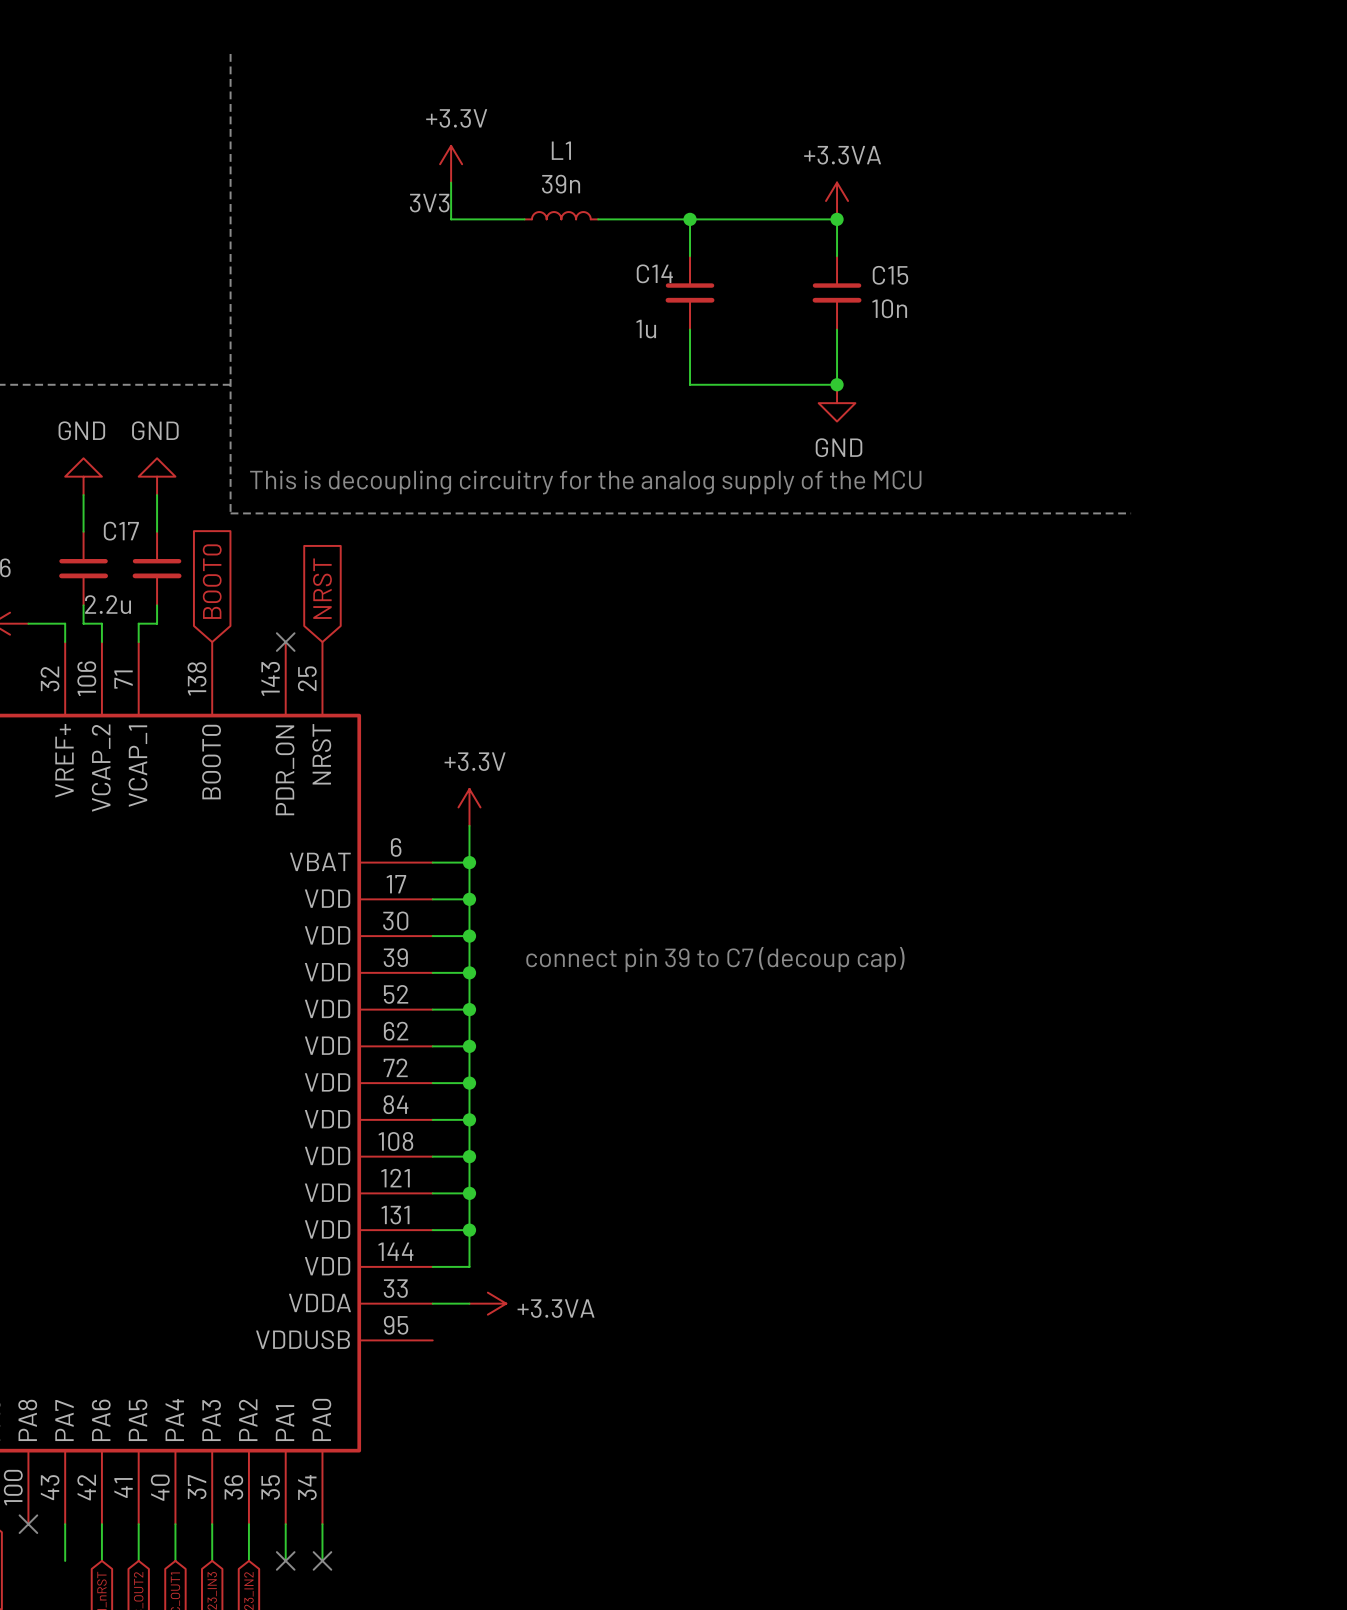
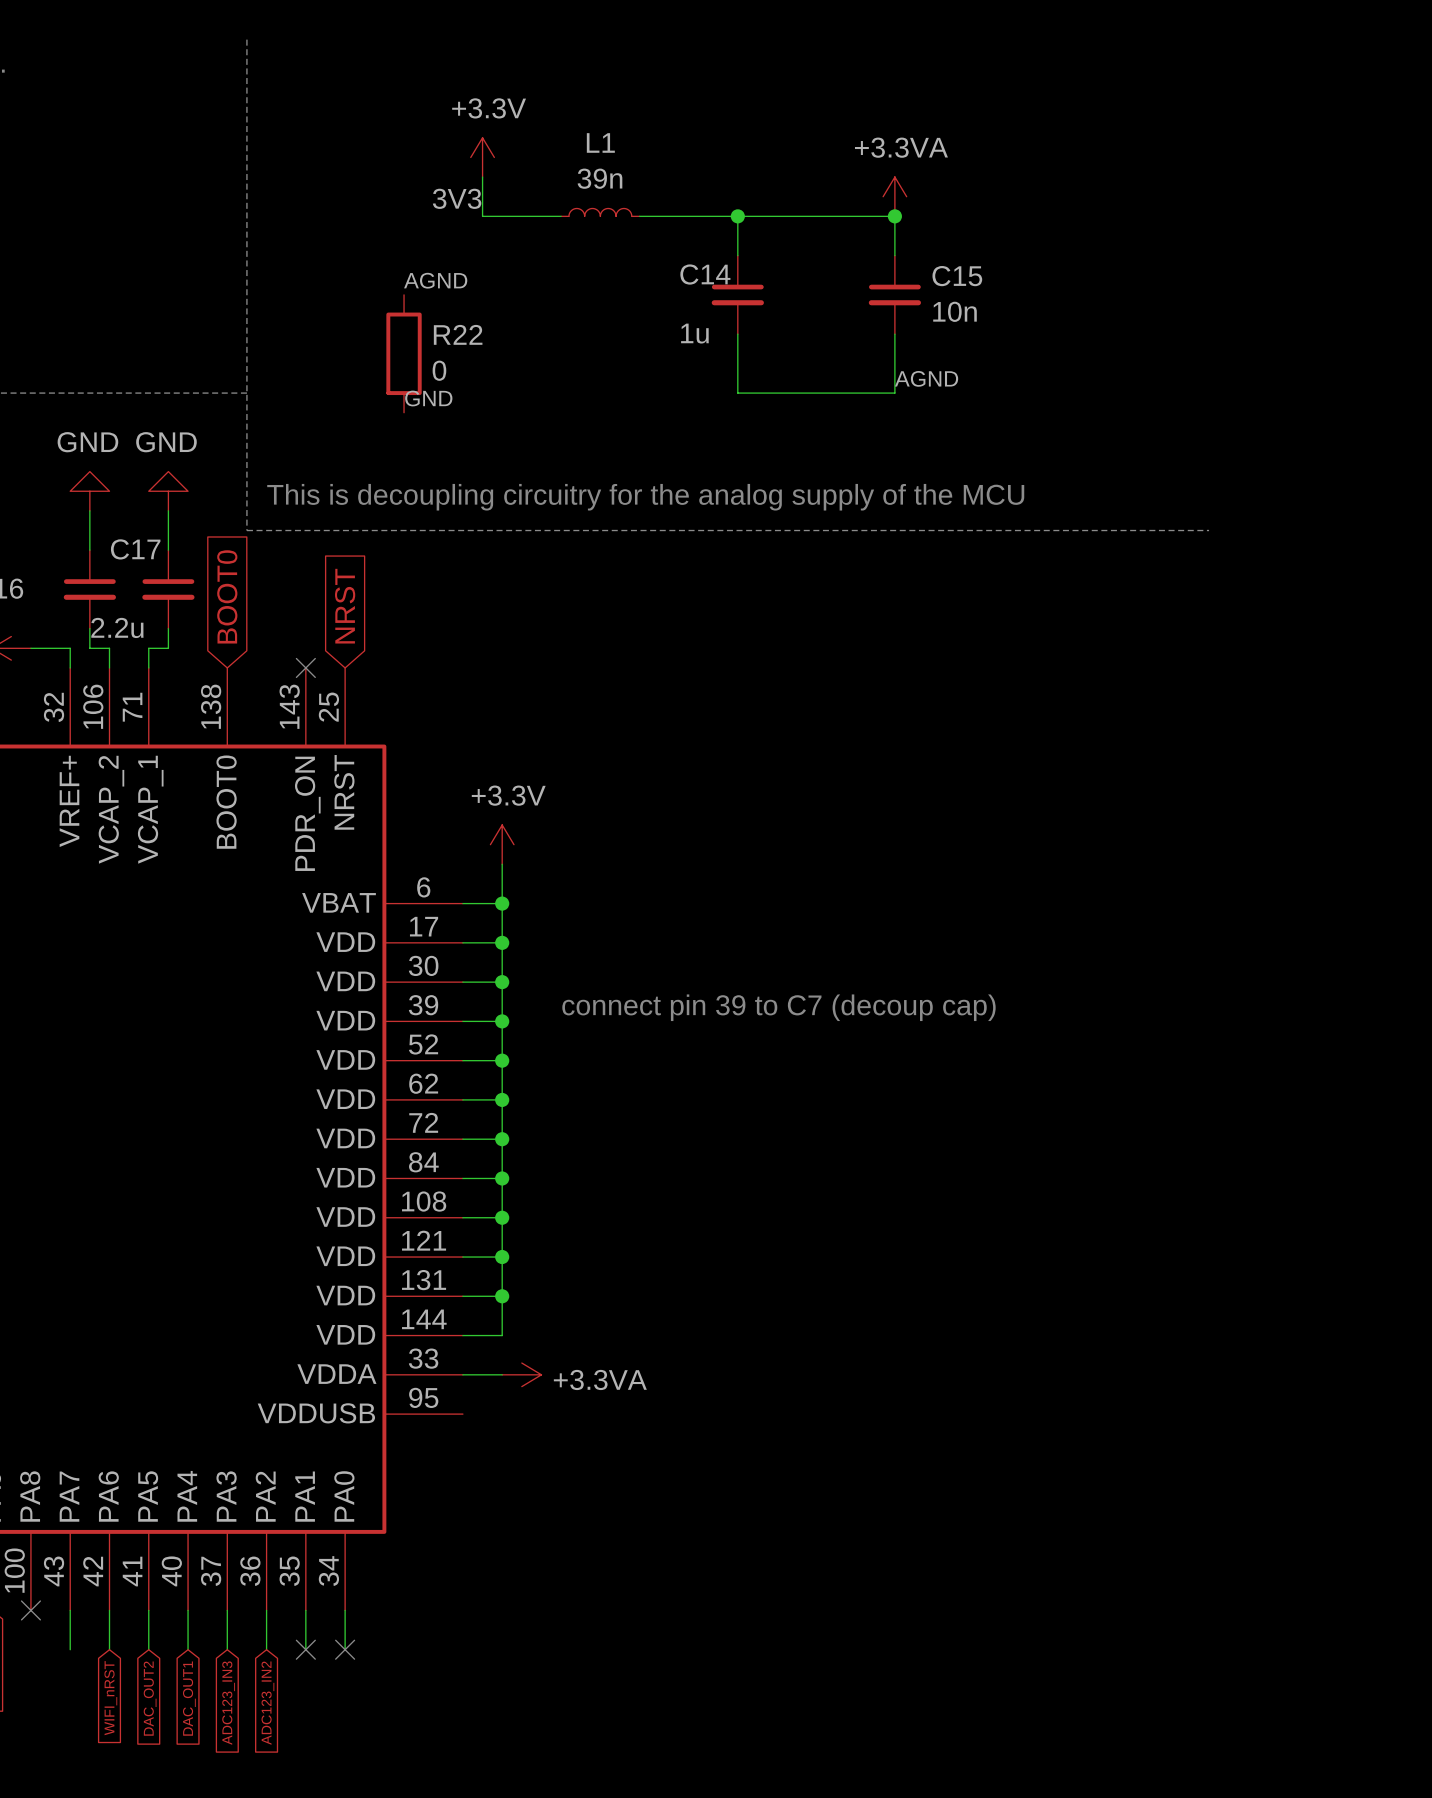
label: none -> AGND (435, 280)
R22: none -> 0 (404, 353)
label: none -> AGND (926, 378)
junction: (837, 384) -> none
label: none -> GND (428, 398)
power symbol: GND (837, 403) -> none

